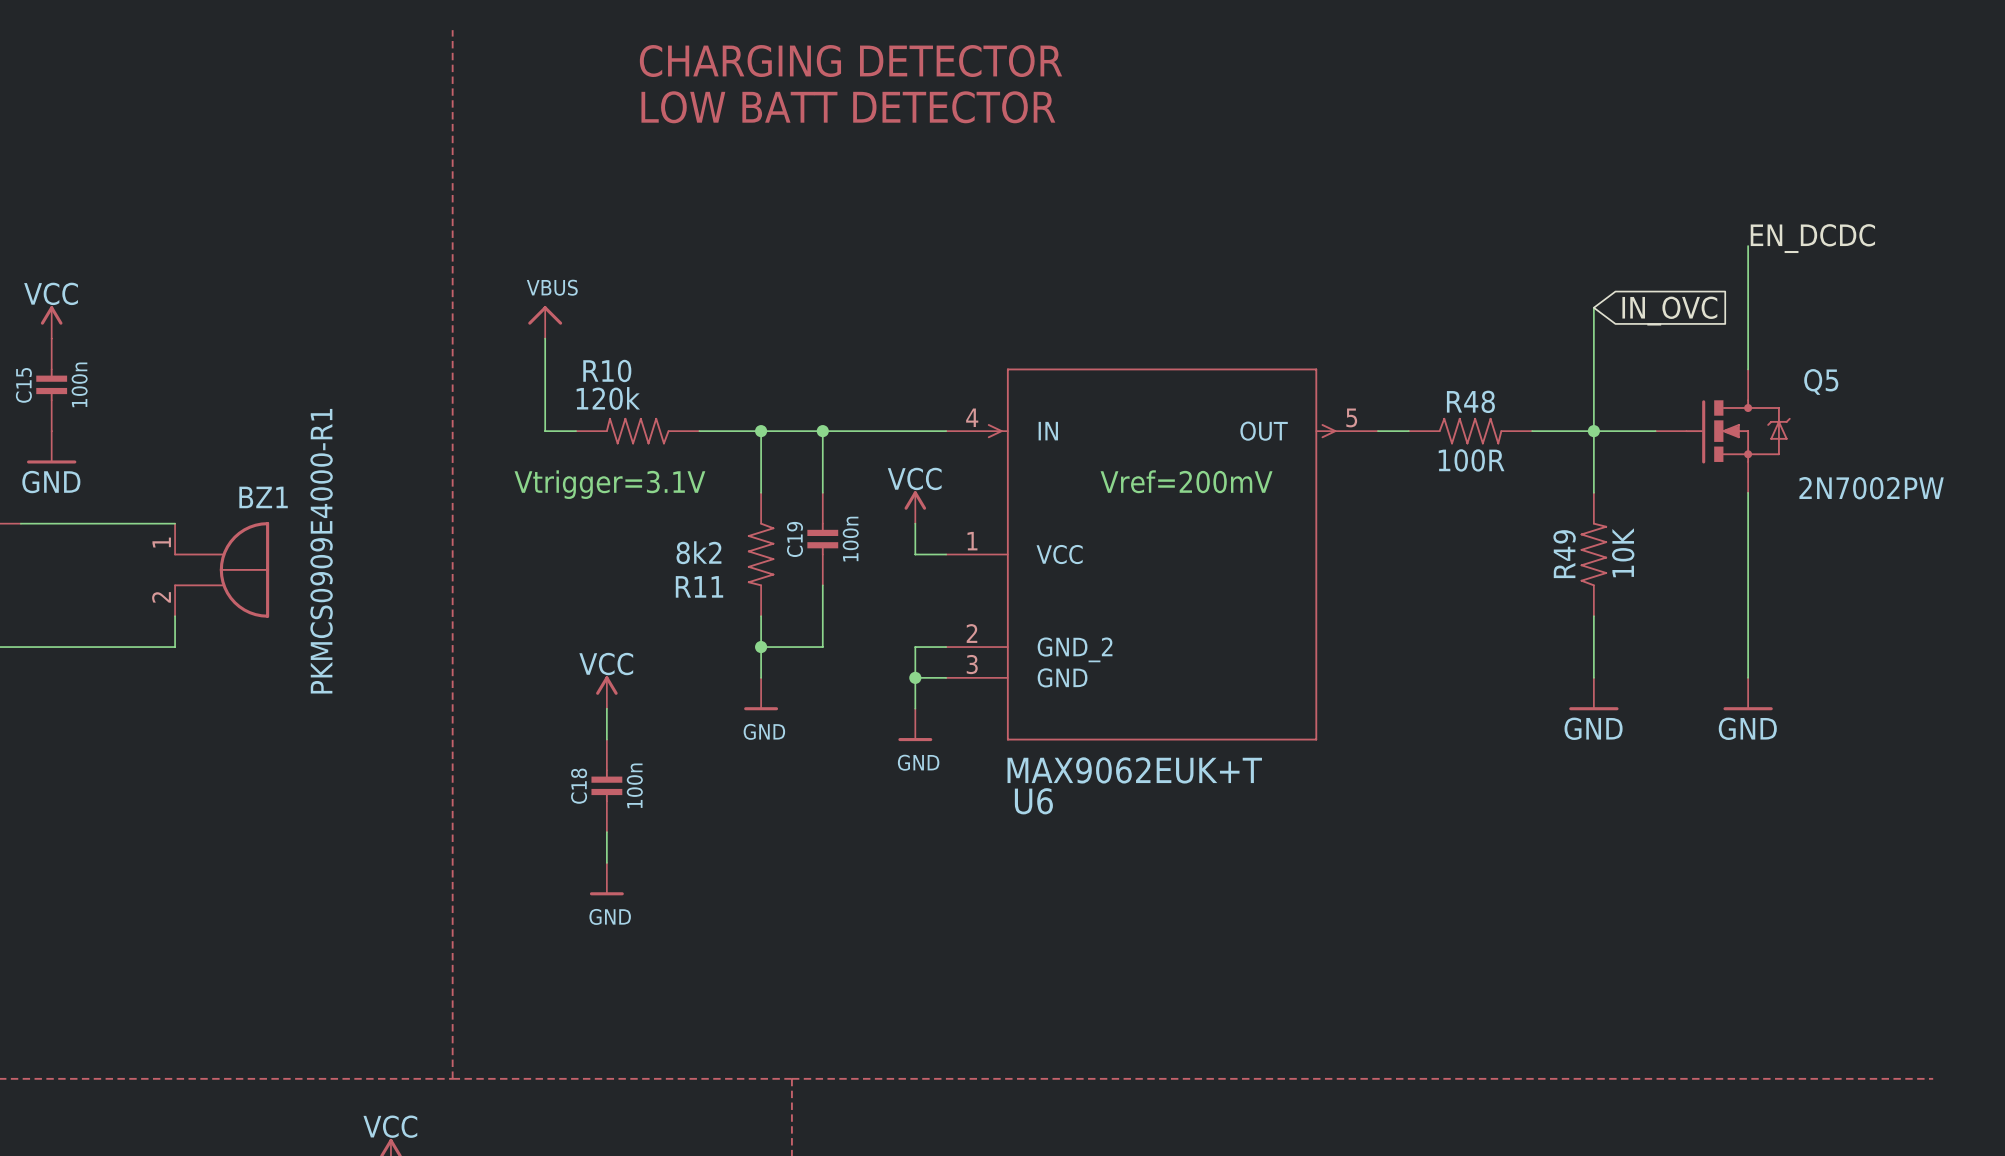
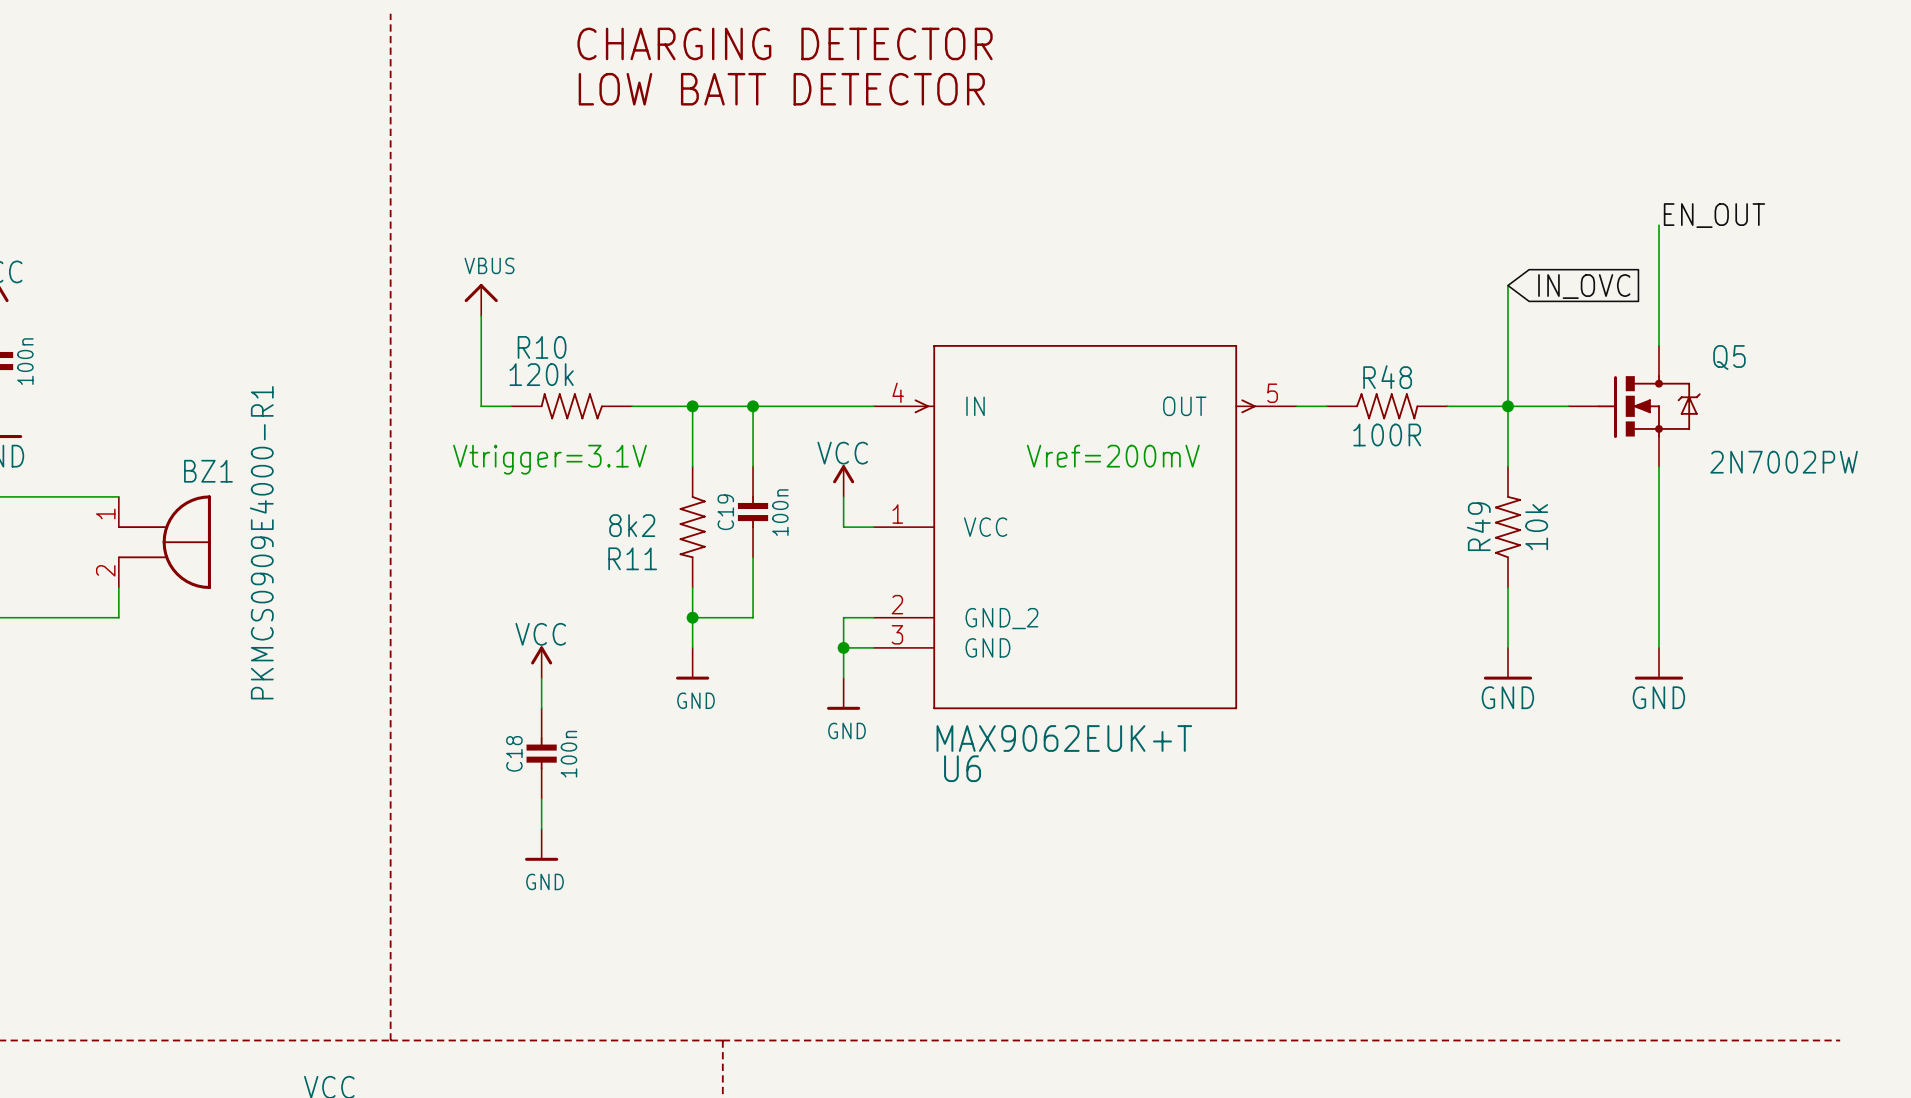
label: EN_DCDC (1812, 238) -> EN_OUT (1714, 215)
R49 value: 10K (1623, 552) -> 10k (1536, 527)

